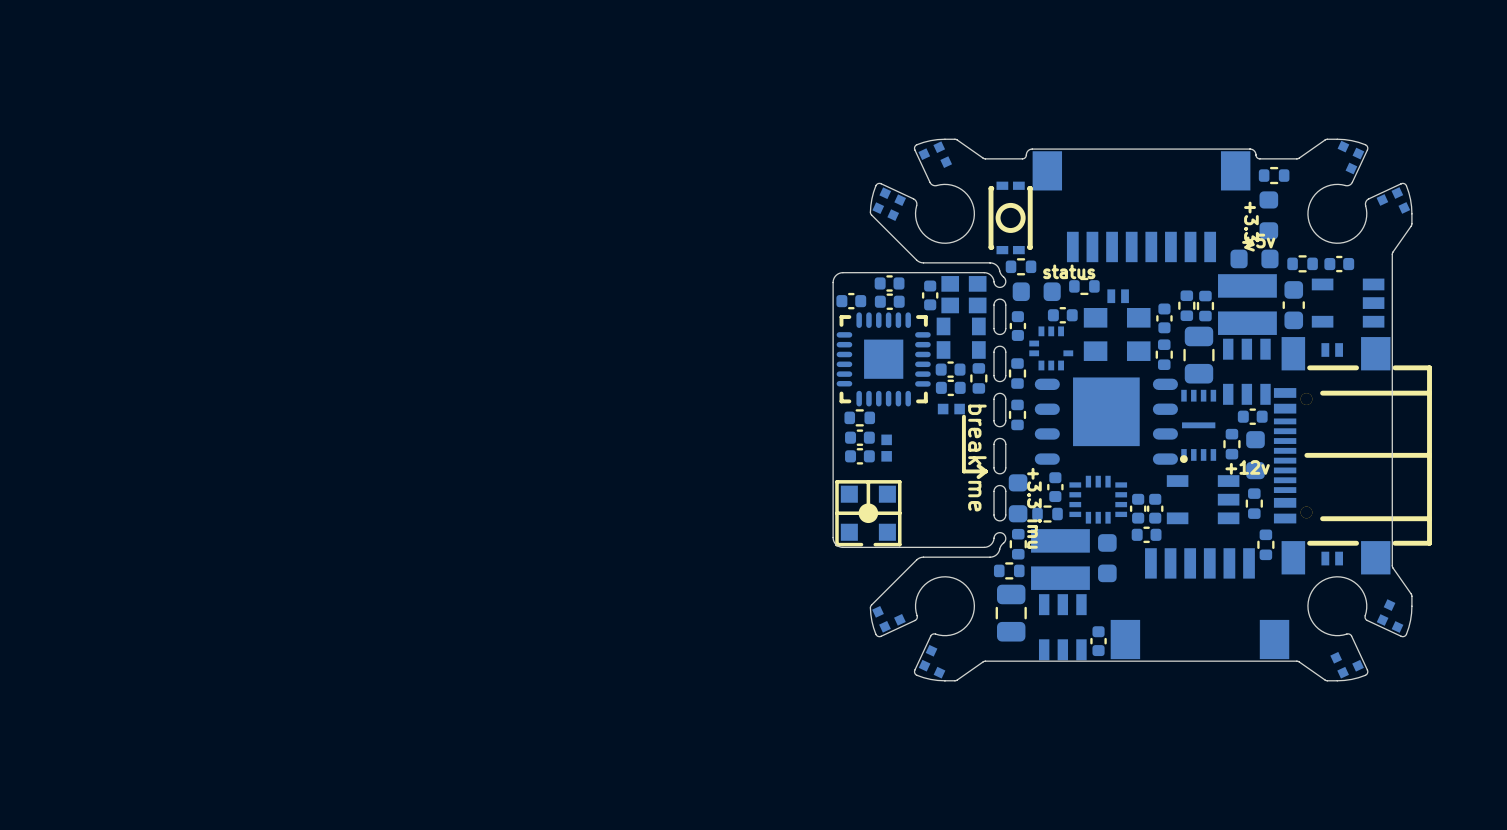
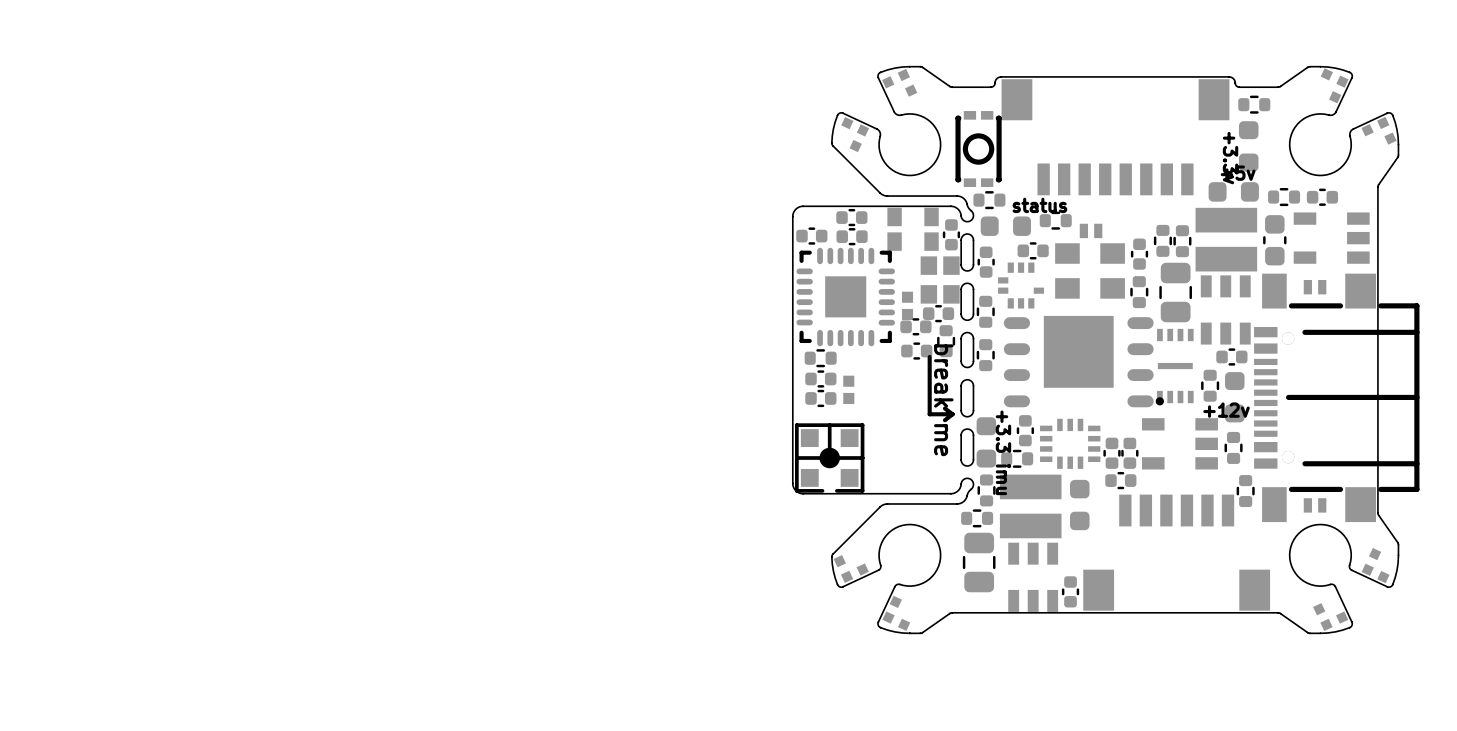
part footprint: [872, 187, 907, 221] -> [841, 117, 870, 153]
part: none -> (913, 229)
part: (963, 294) -> none
part position: (930, 295) -> (951, 234)
part footprint: [936, 317, 986, 359] -> [920, 256, 960, 304]
part footprint: [935, 361, 966, 378] -> [901, 291, 914, 321]
part footprint: [970, 363, 988, 394] -> [922, 305, 955, 323]
part: none -> (946, 341)
part footprint: [937, 403, 965, 415] -> [901, 342, 933, 360]

